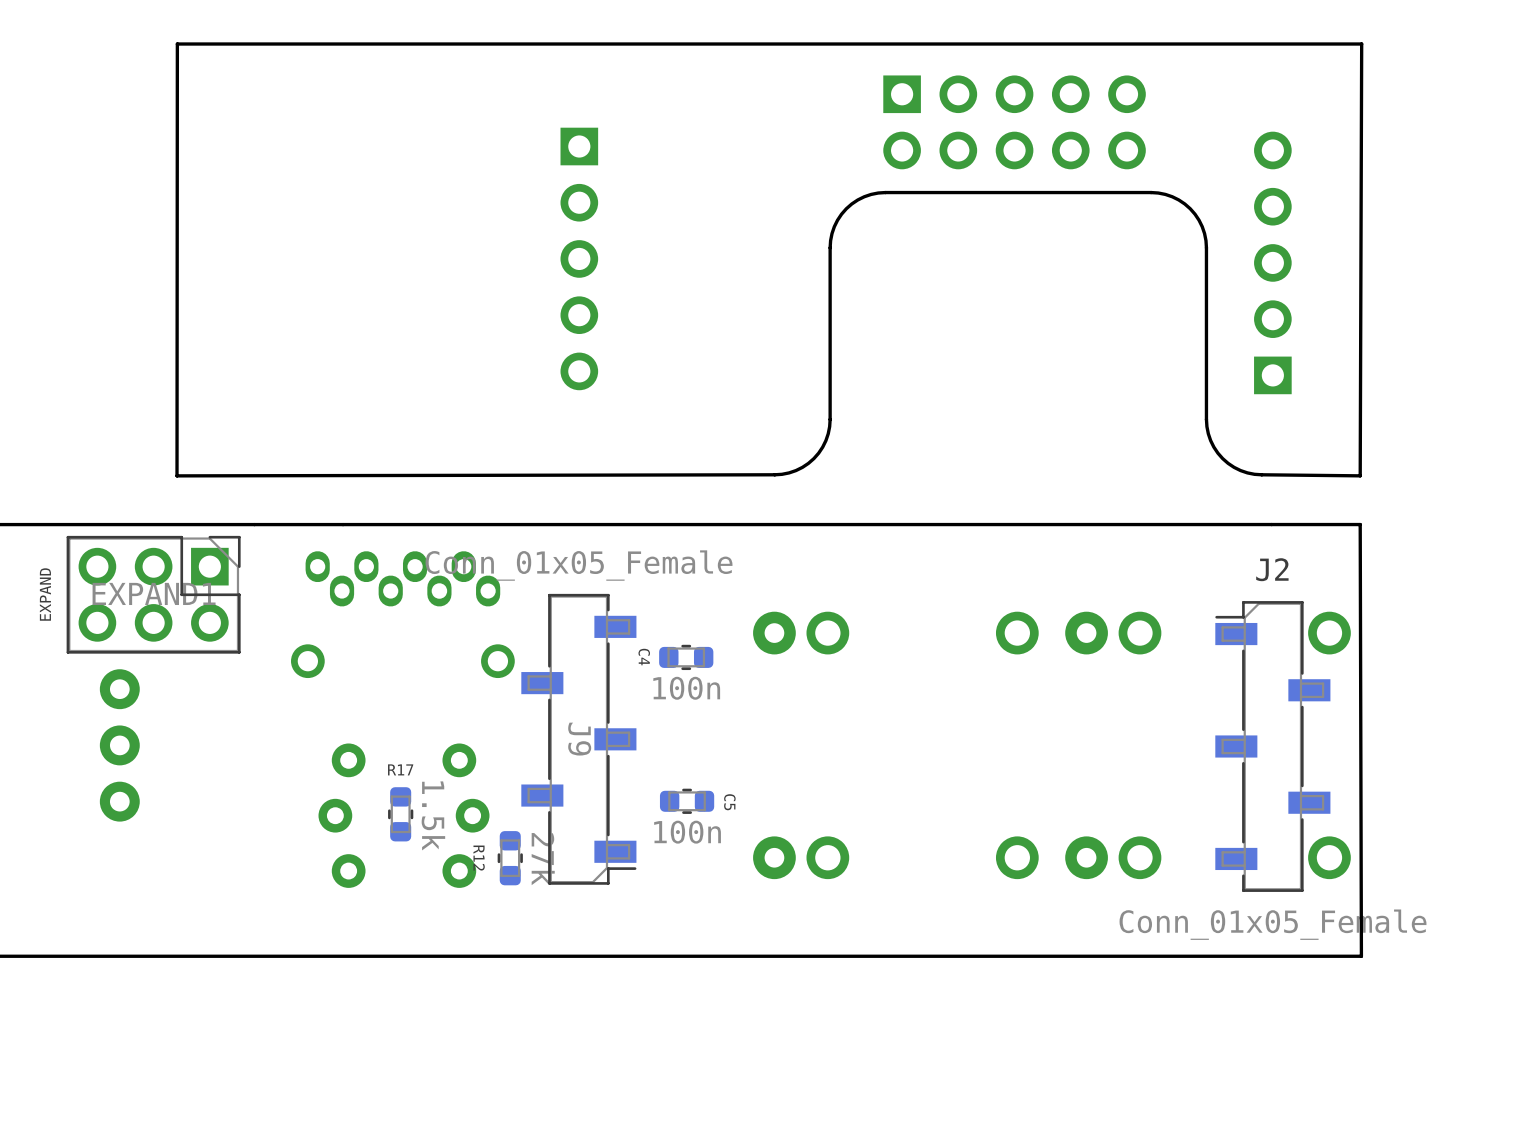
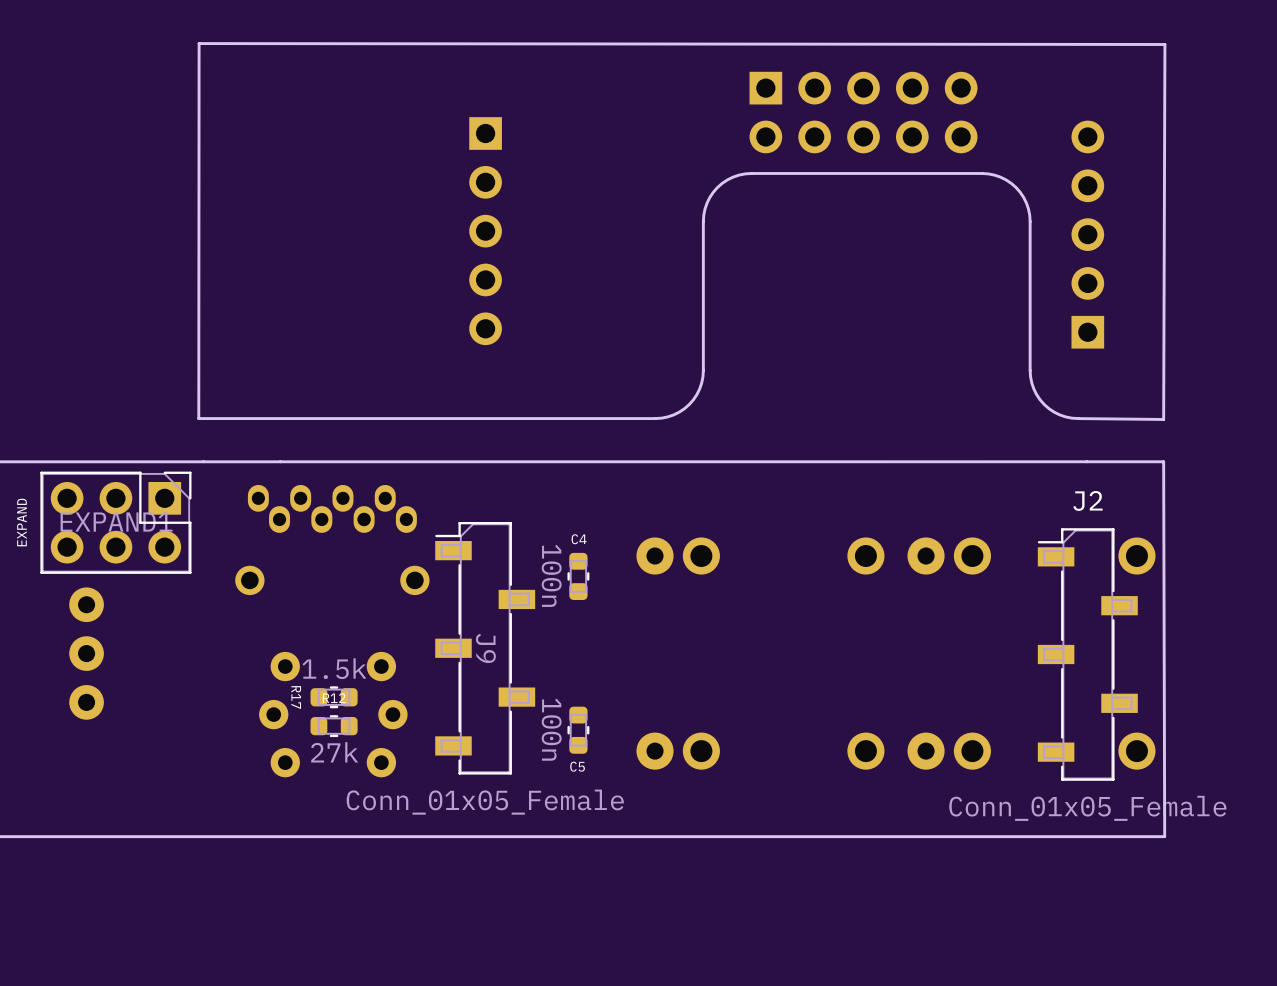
board edge: (1361, 44) (177, 44) (177, 475) (774, 474) -> (1164, 44) (199, 43) (198, 418) (655, 418)
C4 rotation: 0° (686, 657) -> 90° clockwise (578, 576)
J9 rotation: 0° (578, 739) -> 180° (485, 648)
R17 name position: R17 (400, 769) -> R17 (296, 697)
C5 rotation: 0° (687, 801) -> 90° clockwise (578, 730)
R17 rotation: 0° (400, 814) -> 90° clockwise (334, 697)
R17 value position: 1.5k (433, 815) -> 1.5k (334, 668)
R12 rotation: 0° (510, 858) -> 90° clockwise (334, 726)
R12 position: (510, 858) -> (334, 726)

